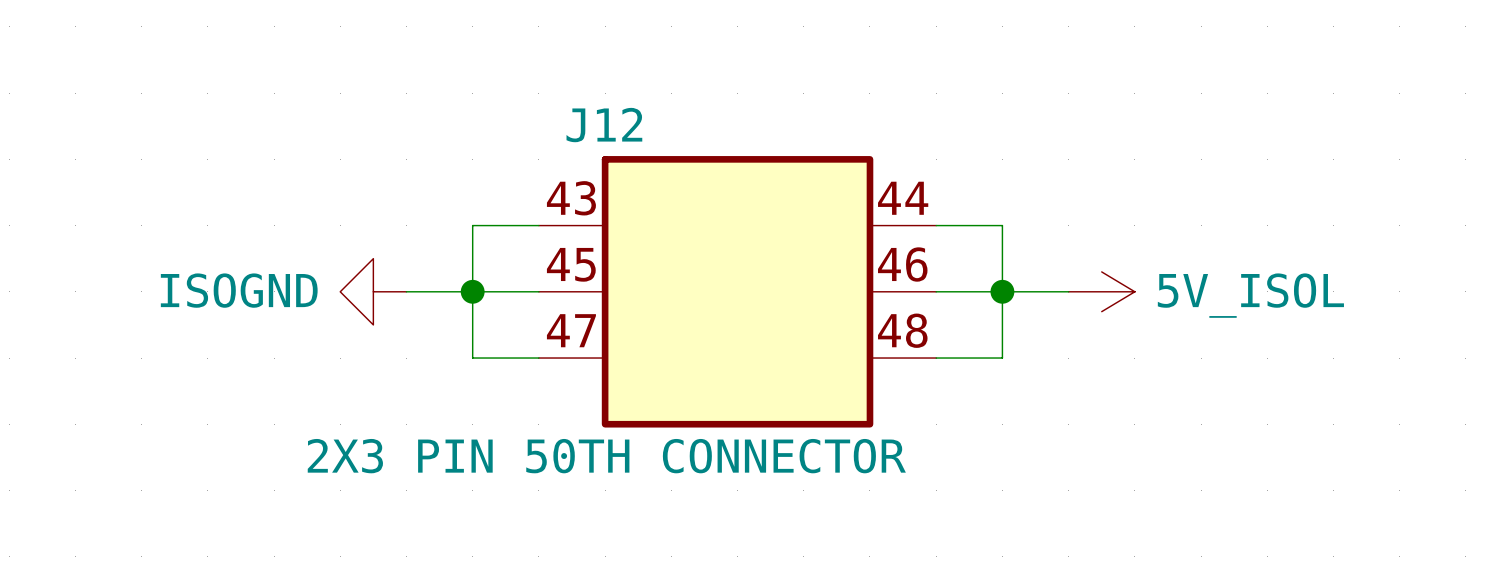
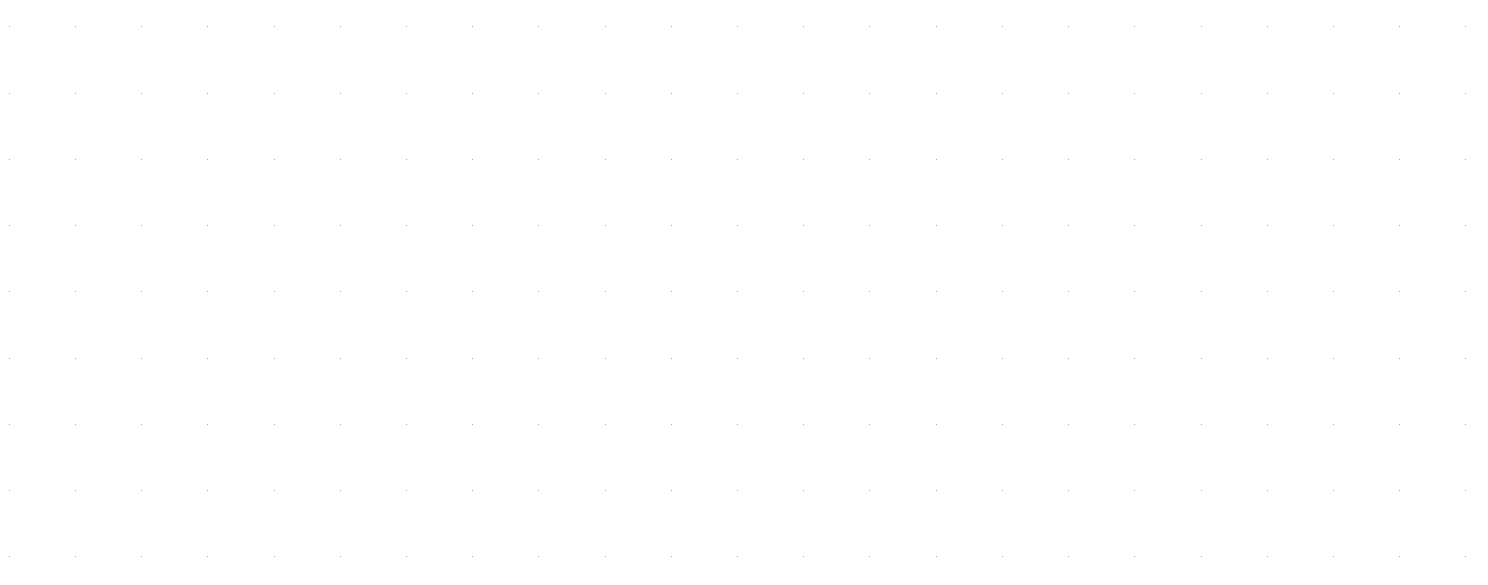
wire: (538, 225) (472, 225) (472, 358) (538, 358) -> none
wire: (936, 225) (1002, 225) (1002, 358) (936, 358) -> none
power symbol: ISOGND (373, 291) -> none
wire: (406, 291) (538, 291) -> none
junction: (472, 291) -> none
J12: 2X3 PIN 50TH CONNECTOR (737, 291) -> none
wire: (936, 291) (1068, 291) -> none
junction: (1002, 291) -> none
power symbol: 5V_ISOL (1101, 291) -> none

